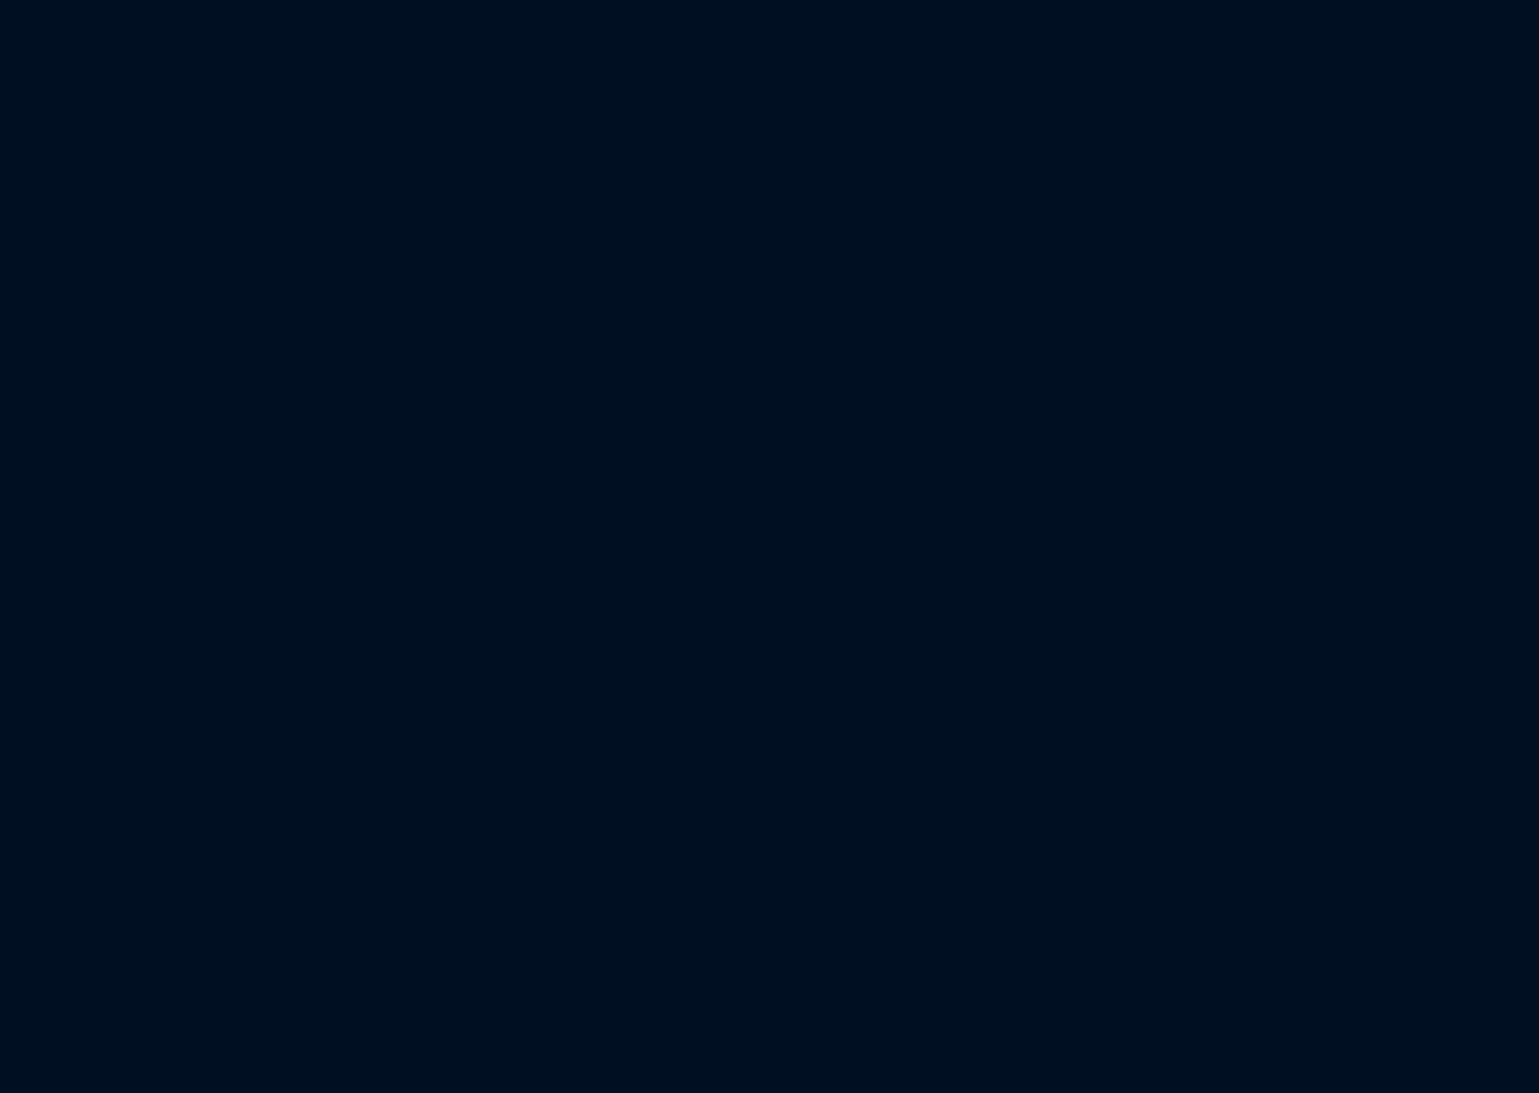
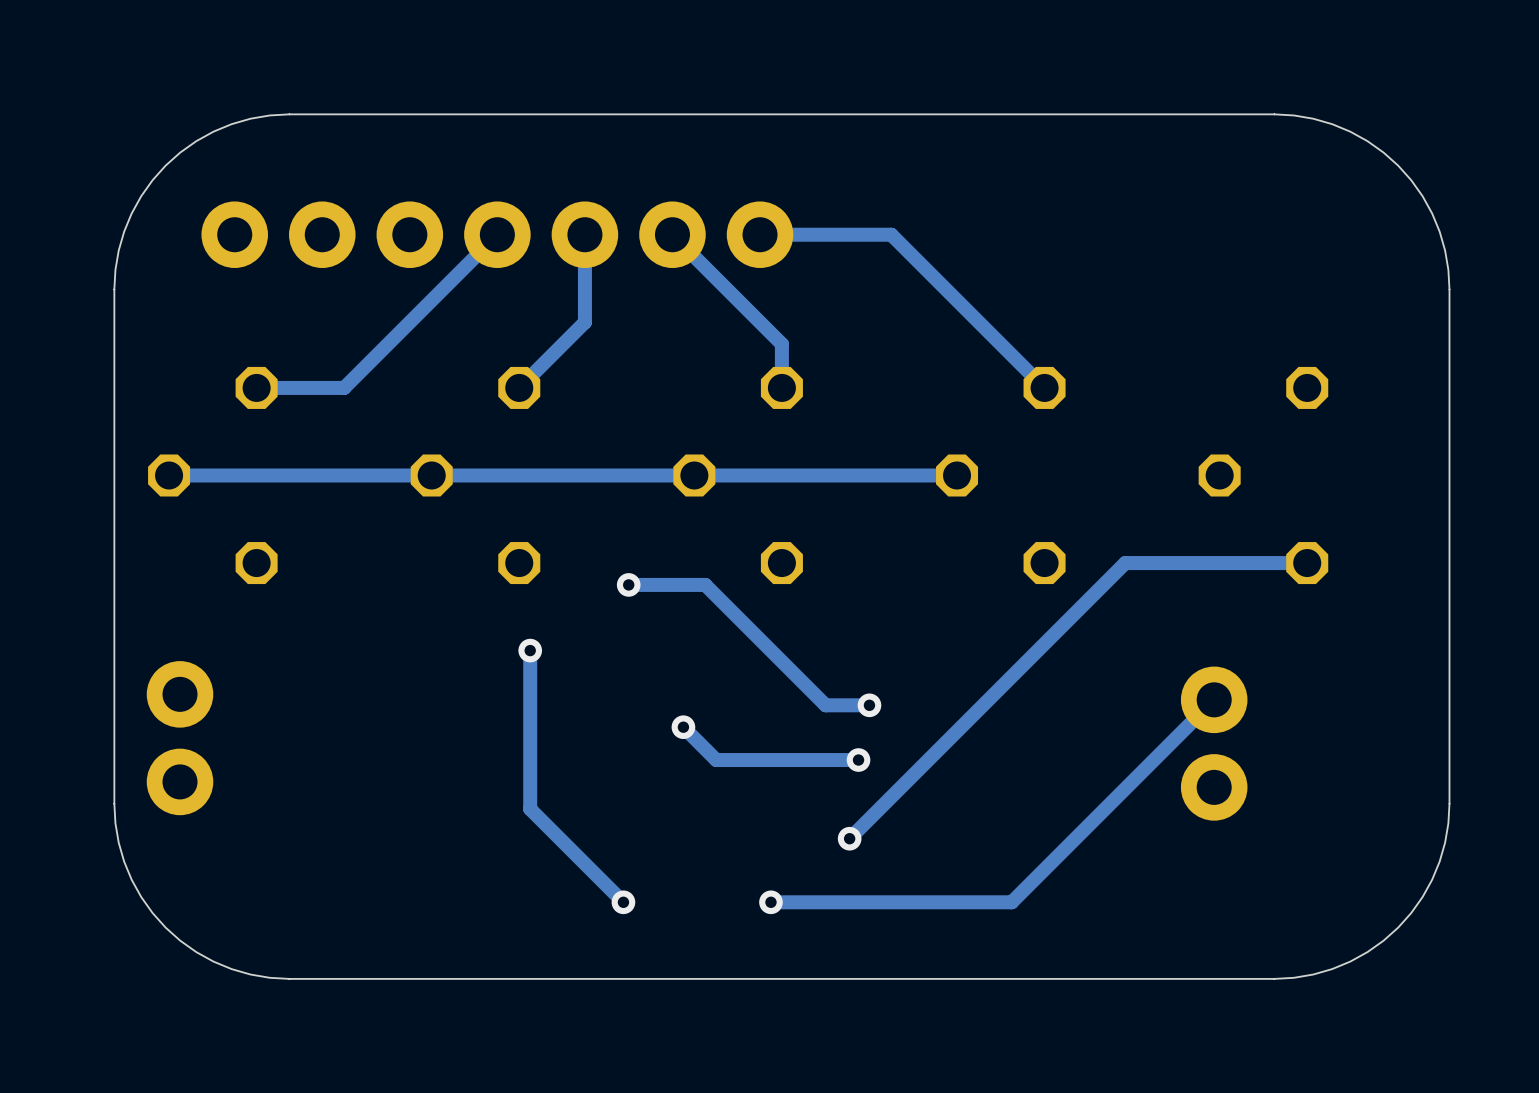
board edge: none -> (1274, 114) (289, 114) (250, 118) (231, 124) (196, 141) (165, 165) (141, 196) (124, 231) (115, 269) (114, 803) (118, 842) (124, 861) (141, 896) (165, 927) (196, 952) (231, 969) (250, 974) (289, 978) (1274, 978) (1313, 974) (1332, 969) (1367, 952) (1398, 927) (1422, 896) (1439, 861) (1448, 823) (1448, 269) (1439, 231) (1432, 213) (1422, 196) (1398, 165) (1367, 141) (1350, 131) (1313, 118) (1274, 114)
part: none -> (278, 234)
track: none -> (497, 234) (344, 387) (256, 387)
track: none -> (584, 234) (584, 322) (519, 387)
part: none -> (584, 234)
track: none -> (672, 234) (781, 344) (781, 387)
track: none -> (760, 234) (891, 234) (1044, 387)
part: none -> (212, 475)
part: none -> (475, 475)
part: none -> (738, 475)
track: none -> (957, 475) (169, 475)
part: none -> (1000, 475)
part: none -> (1263, 475)
track: none -> (1307, 563) (1125, 563) (849, 838)
track: none -> (628, 584) (705, 584) (825, 705) (869, 705)
via: none -> (628, 584)
track: none -> (530, 650) (530, 809) (623, 902)
via: none -> (530, 650)
track: none -> (1214, 699) (1011, 902) (770, 902)
via: none -> (869, 705)
track: none -> (683, 727) (716, 760) (858, 760)
via: none -> (683, 727)
part: none -> (180, 738)
part: none -> (1214, 743)
via: none -> (858, 760)
via: none -> (849, 838)
via: none -> (623, 902)
via: none -> (770, 902)

